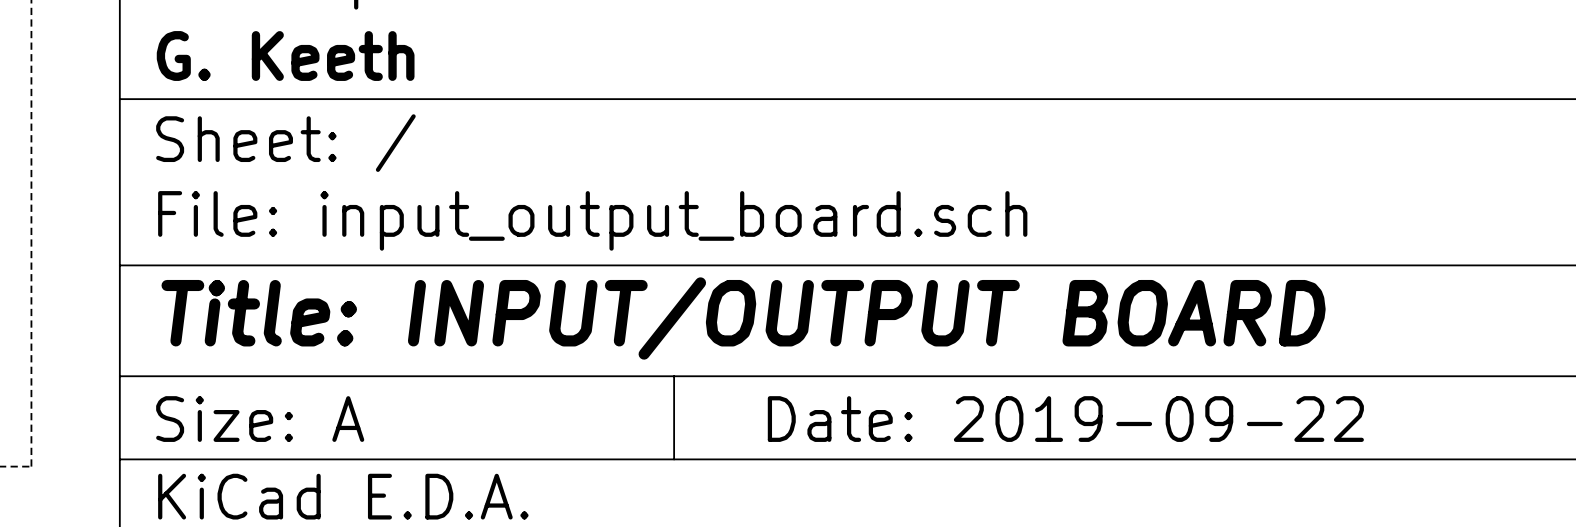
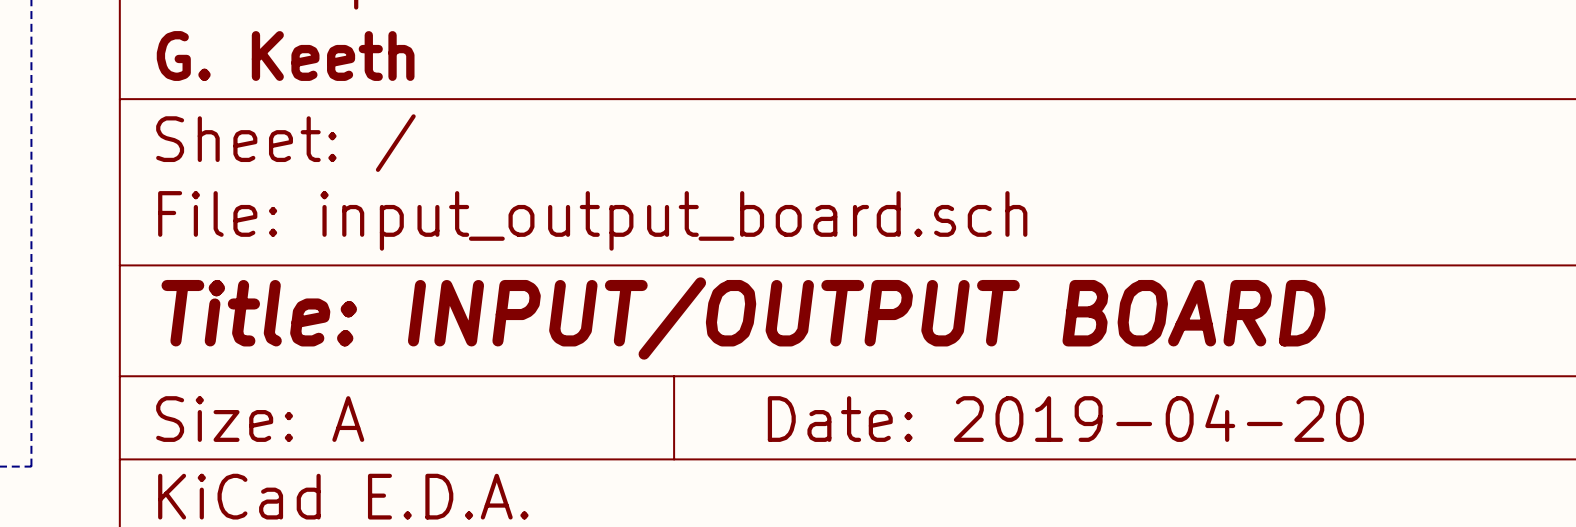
title block: Date: 2019-09-22 (1065, 419) -> Date: 2019-04-20 (1065, 418)

